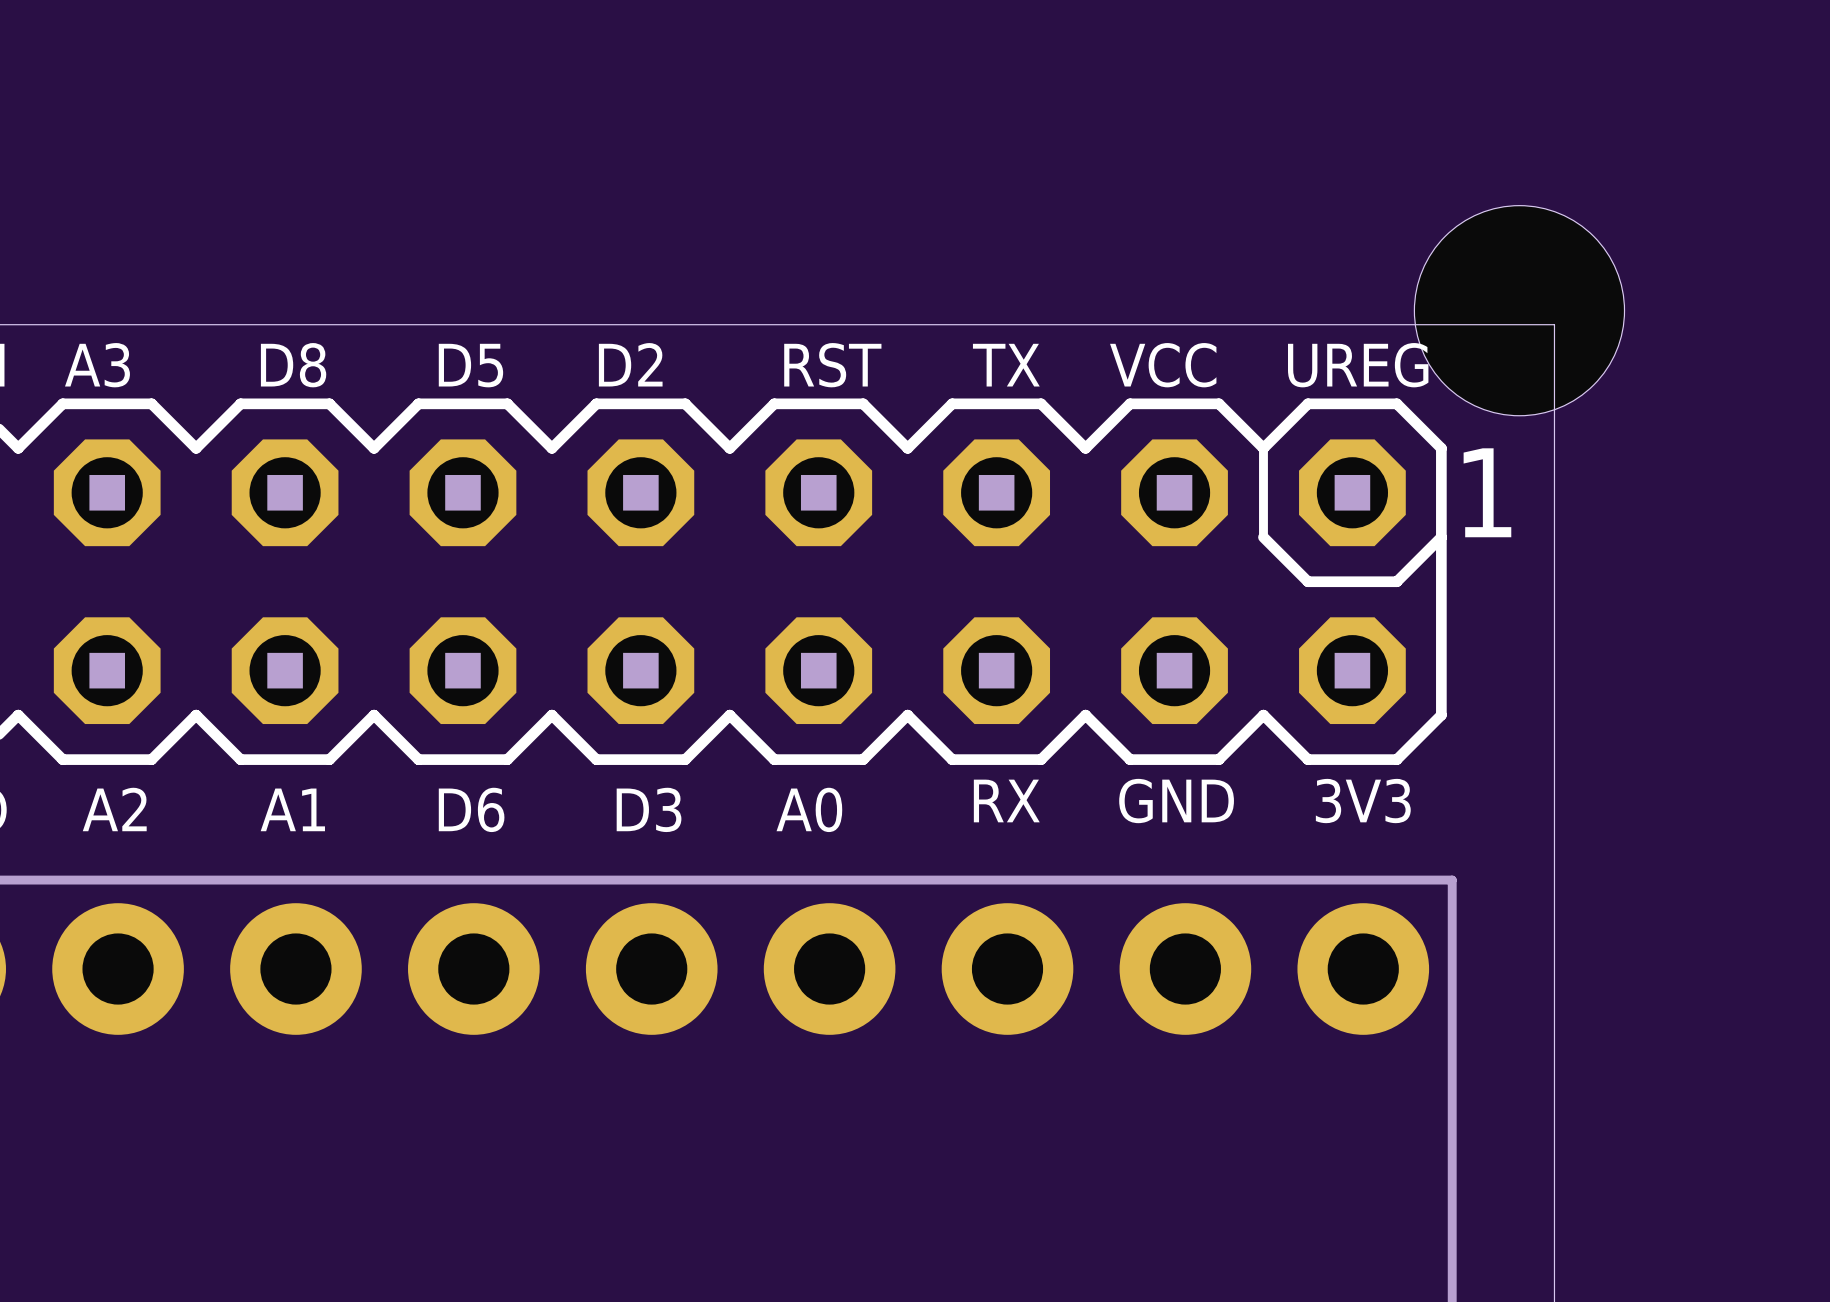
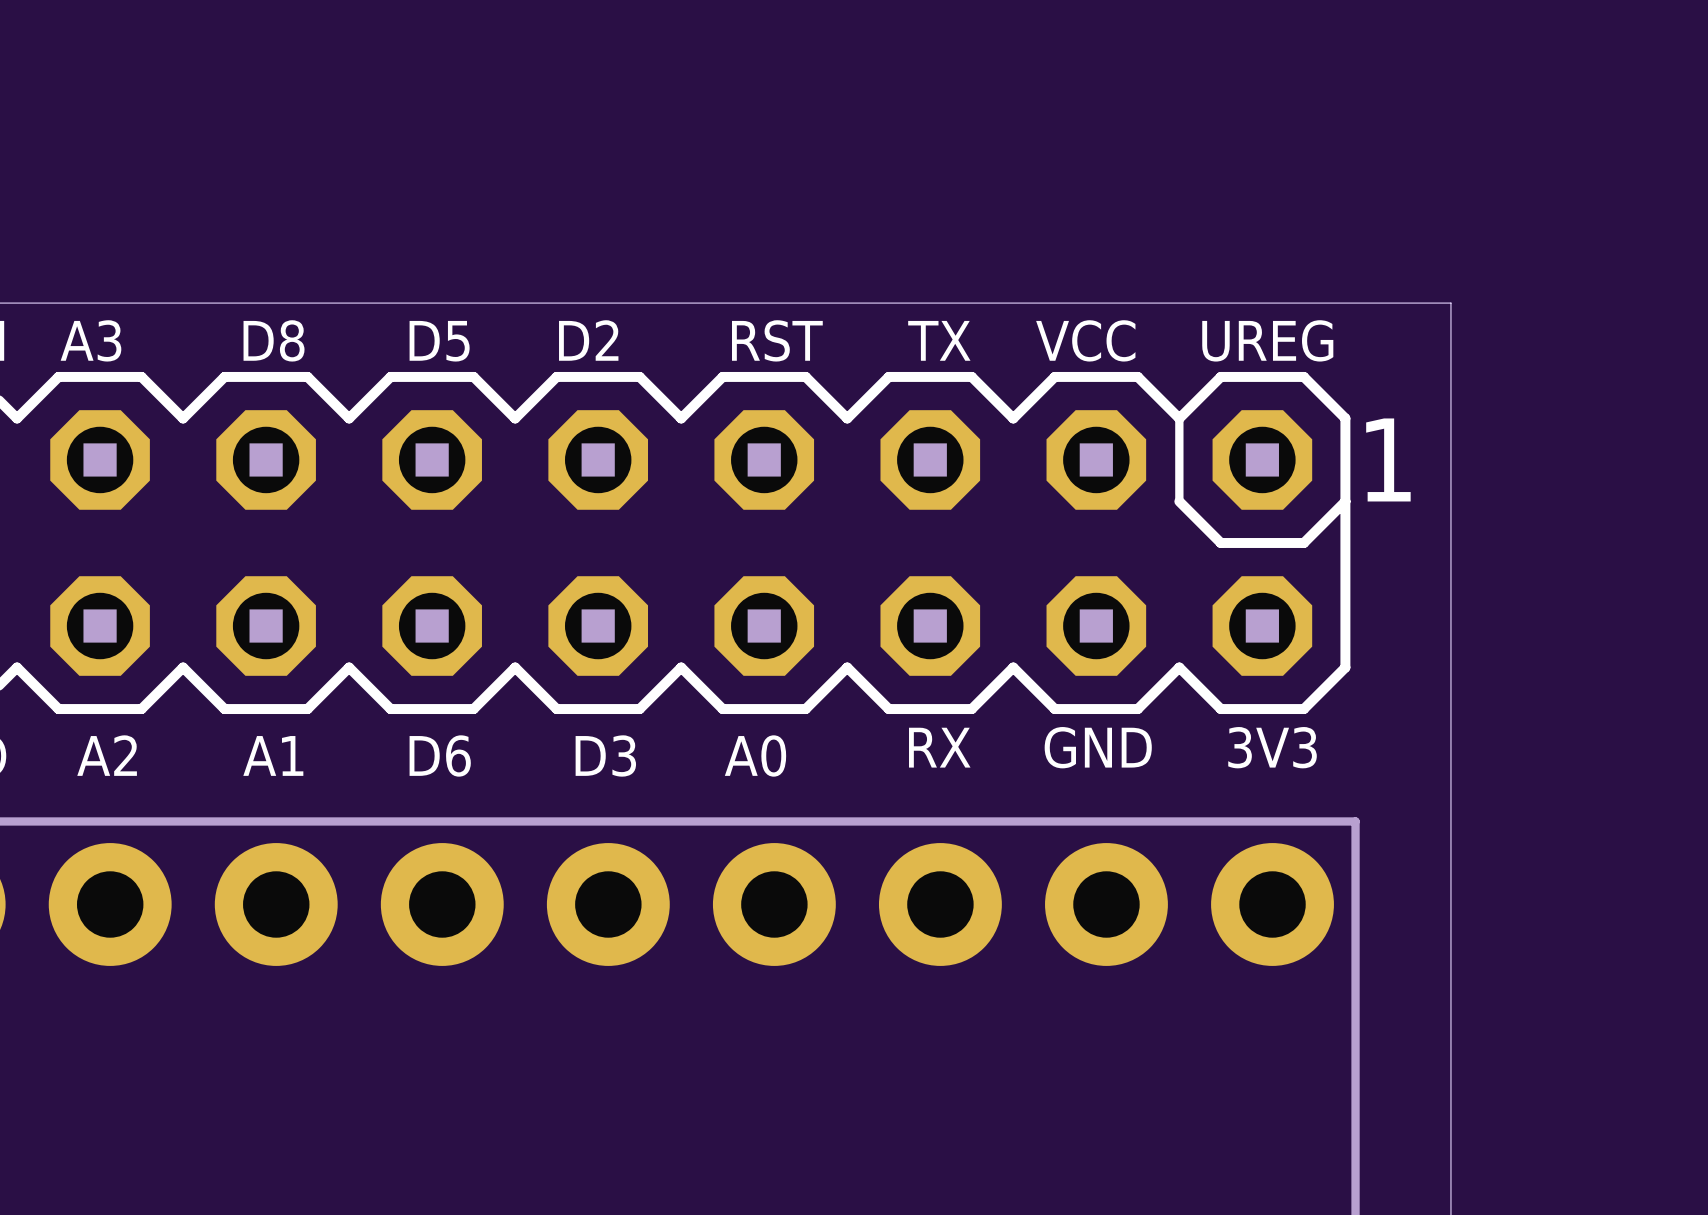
hole: (1519, 310) -> none

